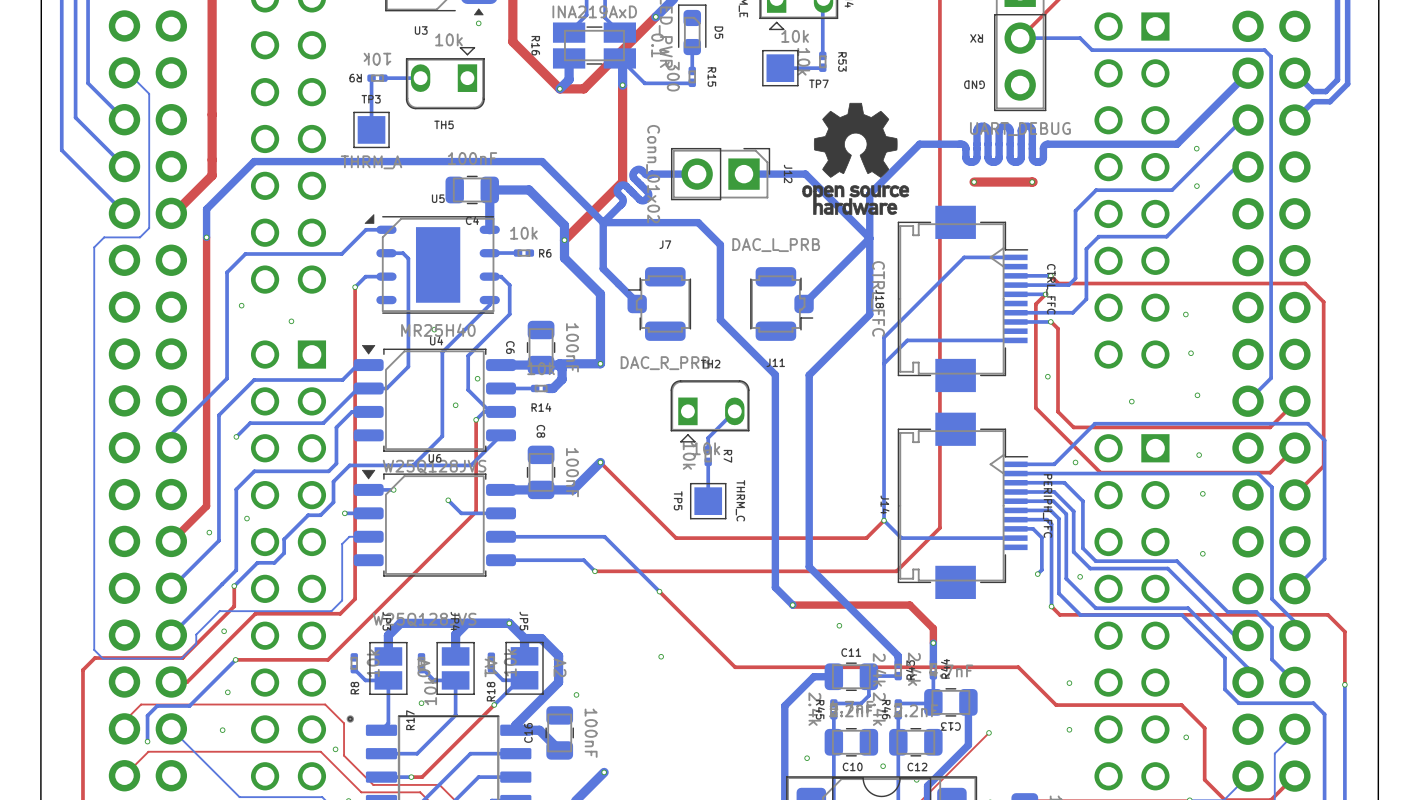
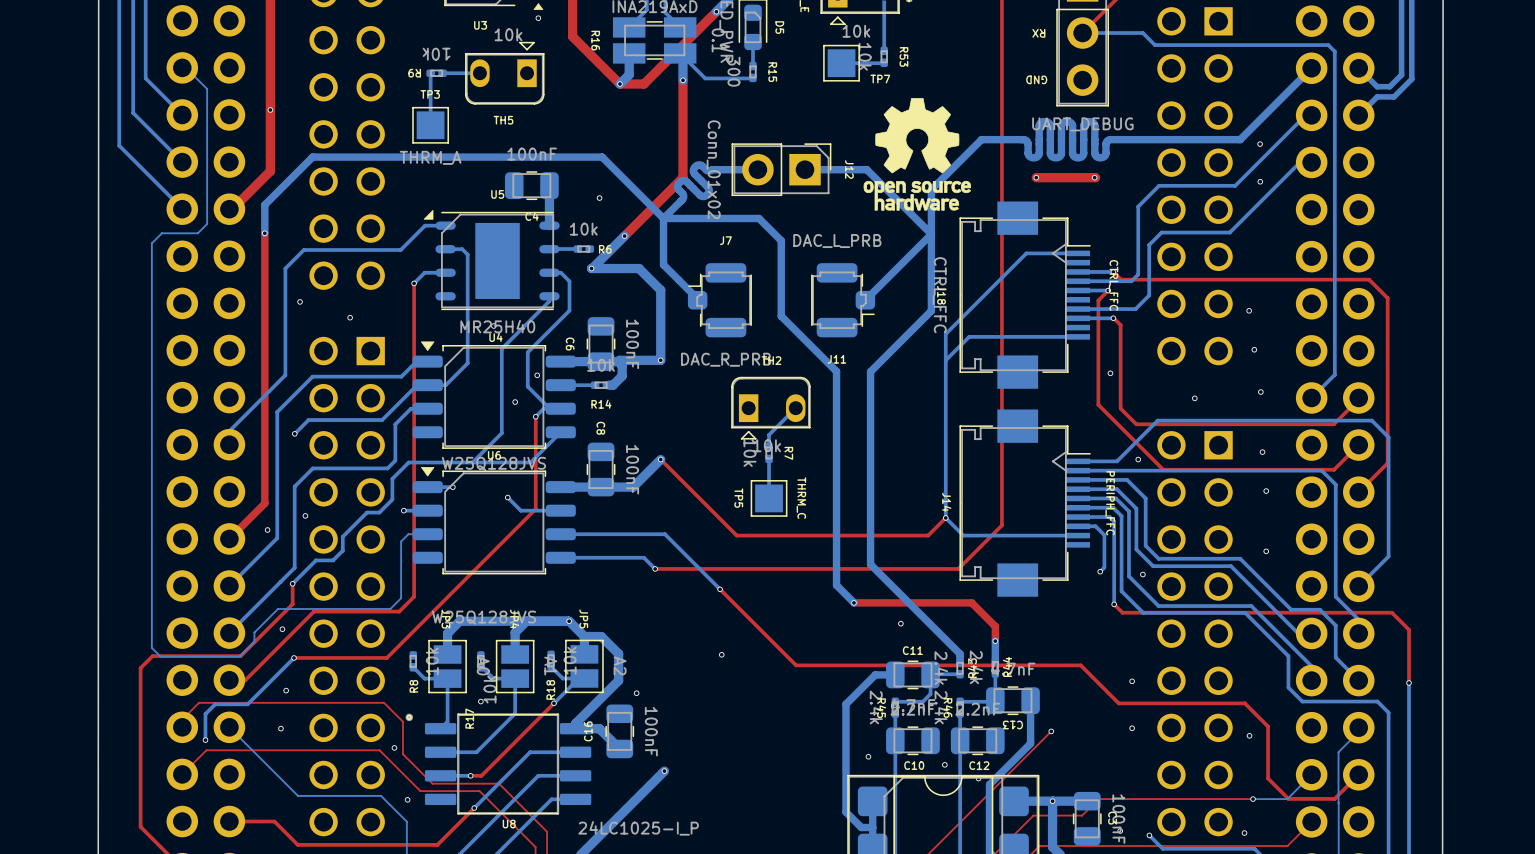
via: none -> (270, 109)
bottom track: (489, 189) (529, 189) (564, 225) (564, 258) (578, 272) -> (591, 268) (639, 268)
via: none -> (599, 198)
bottom track: none -> (624, 236) (592, 268)
via: none -> (591, 268)

